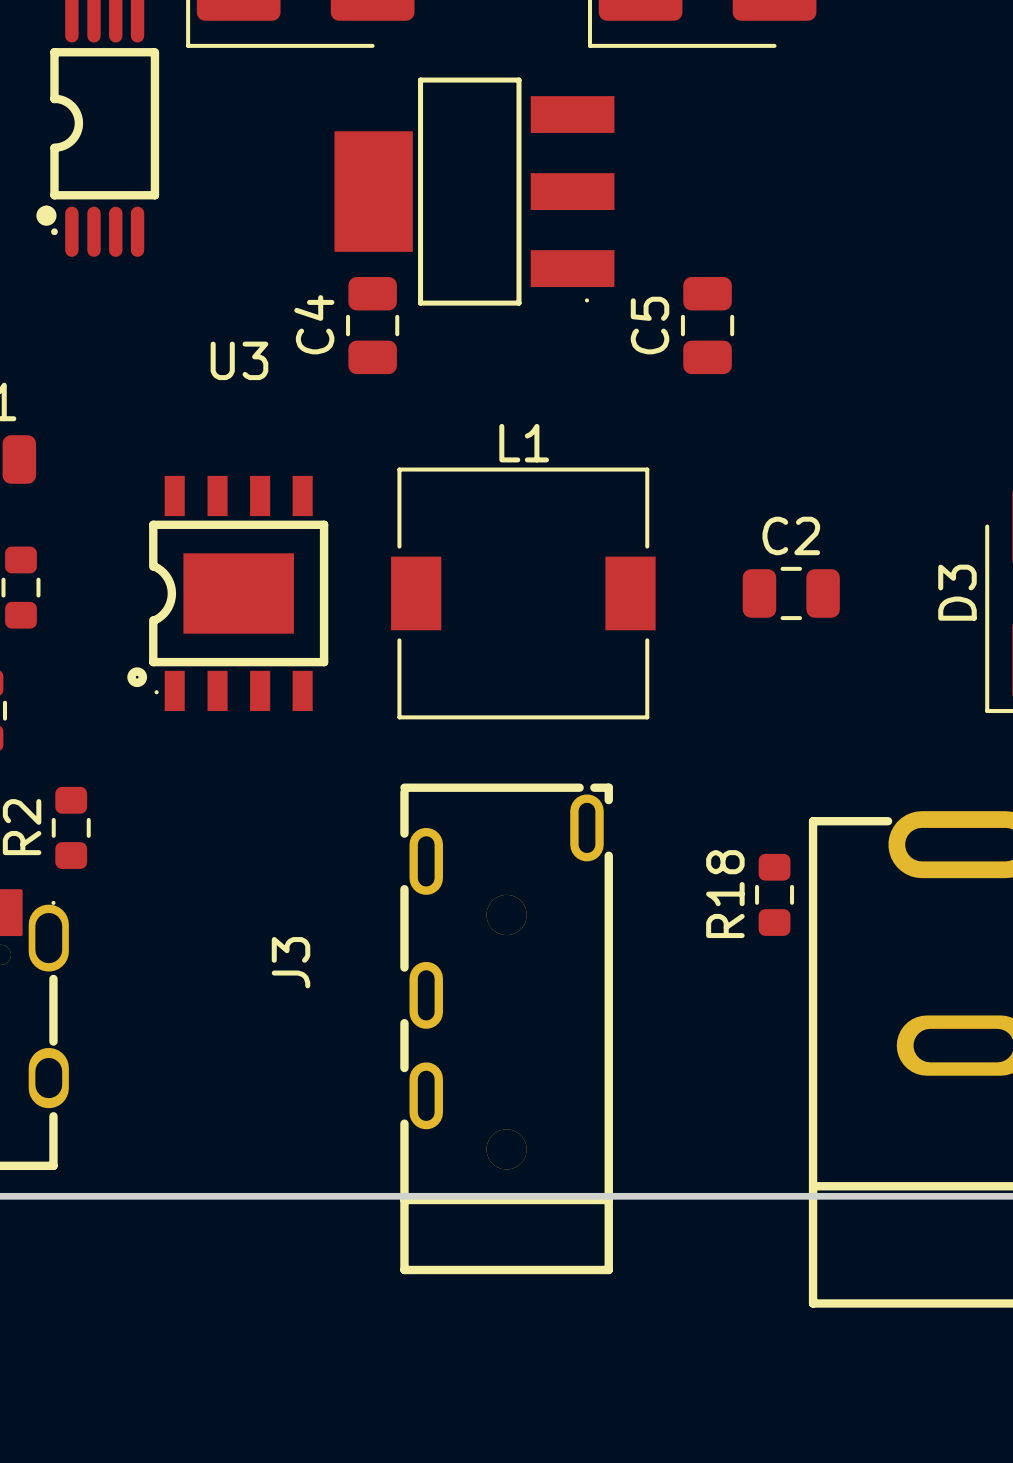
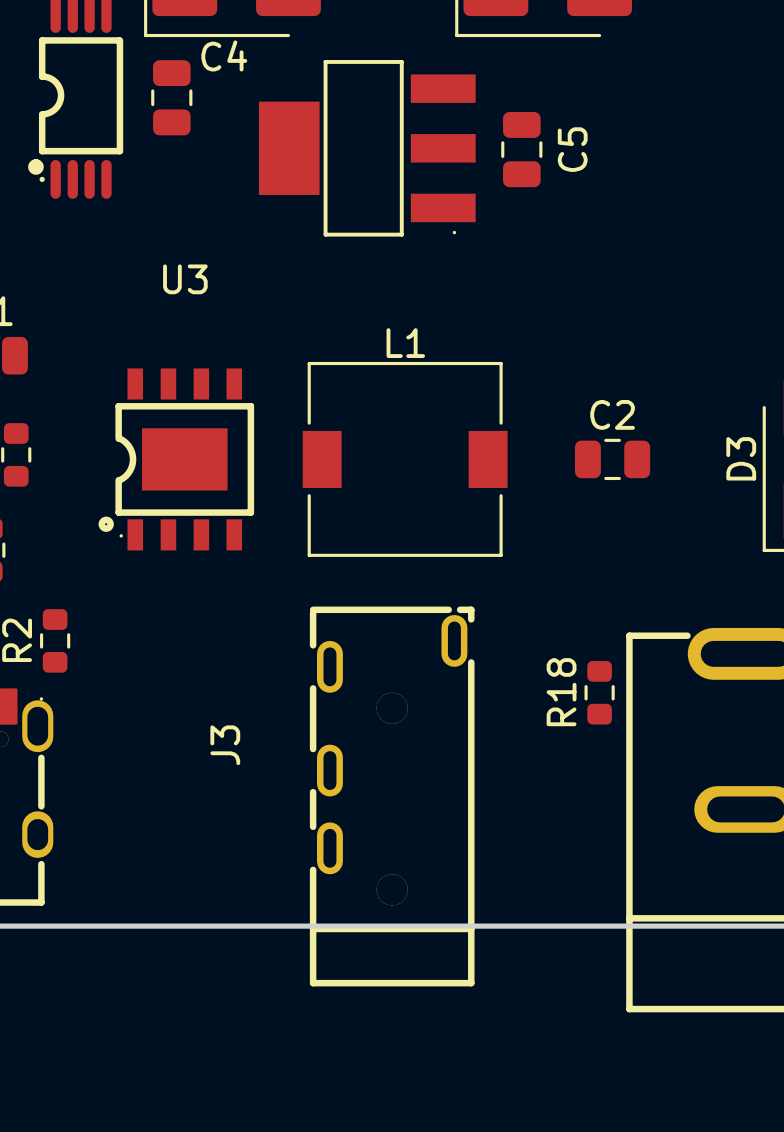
C4 name rotation: 0° (314, 324) -> 90° clockwise (224, 55)
C4 name position: C4 (314, 324) -> C4 (224, 55)
C4 position: (372, 325) -> (171, 97)
C5 name position: C5 (650, 325) -> C5 (572, 149)
C5 position: (707, 325) -> (521, 149)

